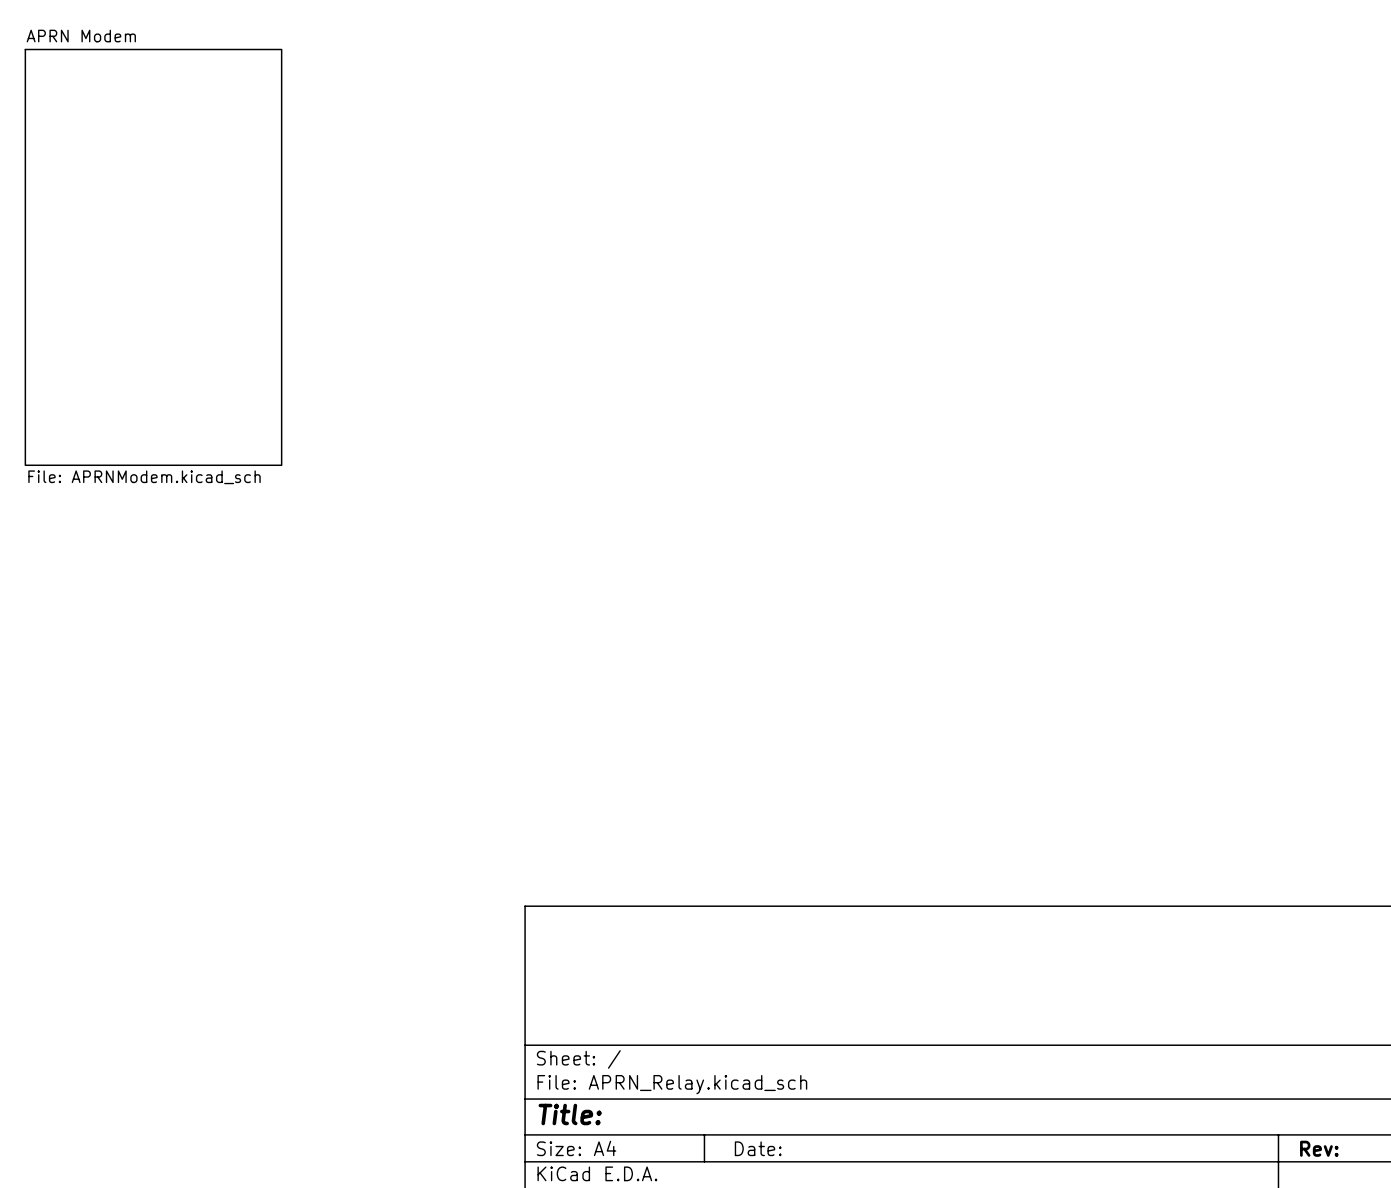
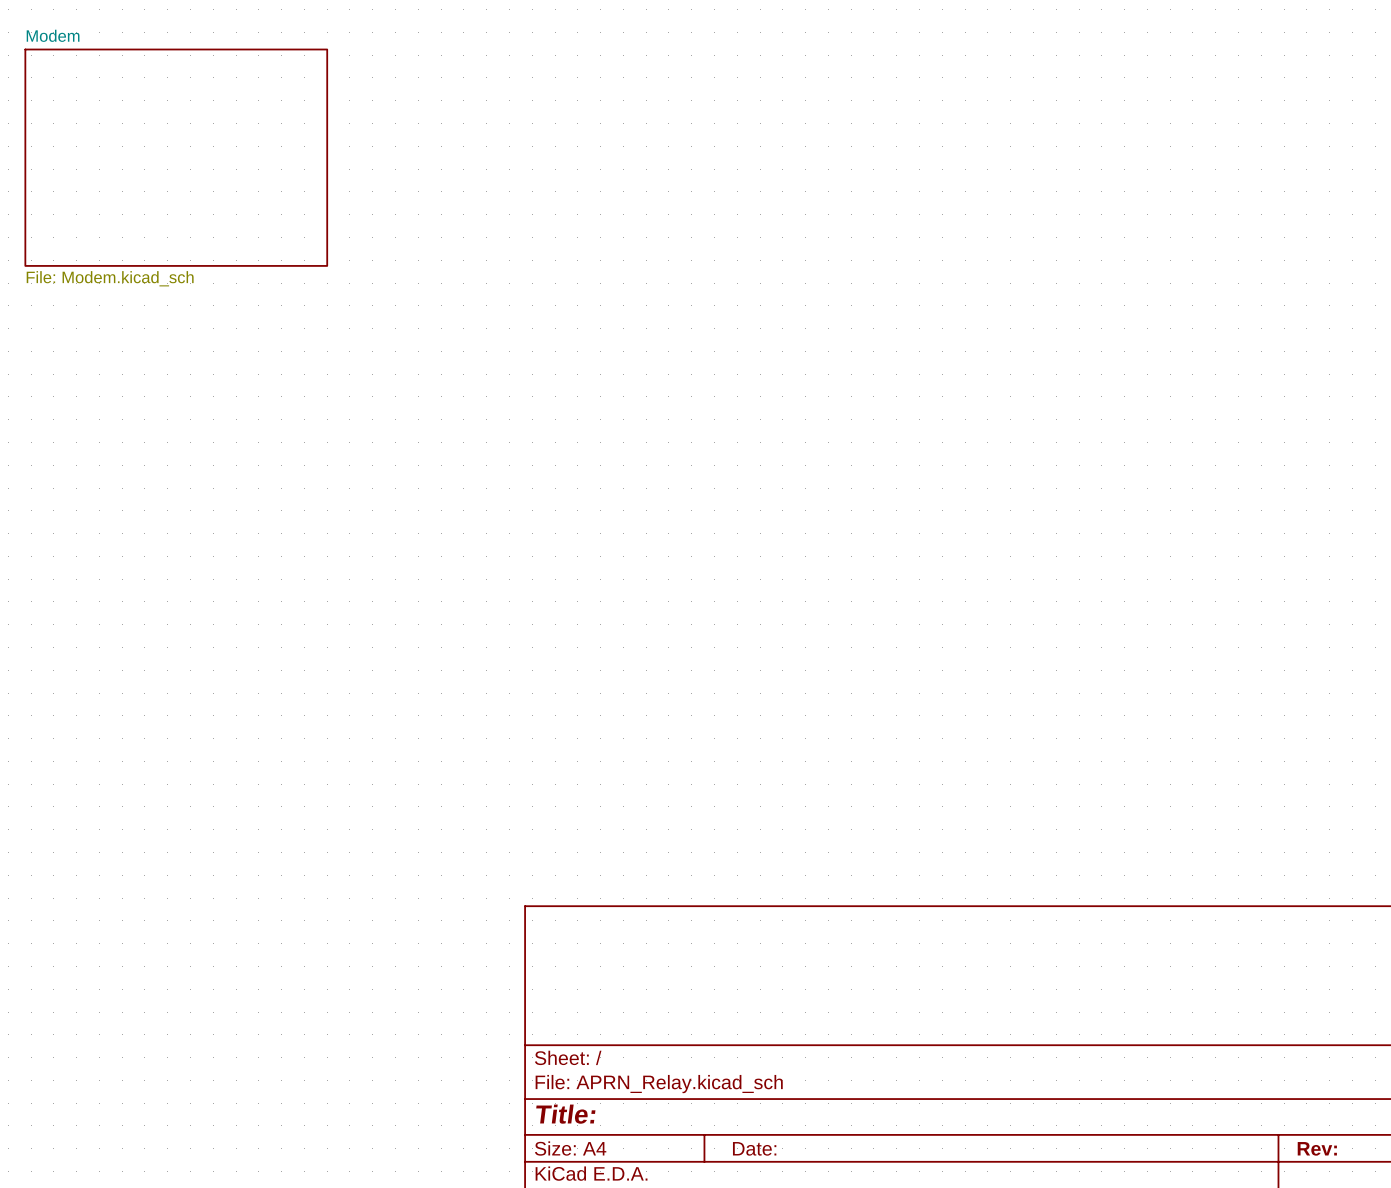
sheet Modem: none -> File: Modem.kicad_sch (176, 157)
sheet APRN Modem: File: APRNModem.kicad_sch (153, 257) -> none

